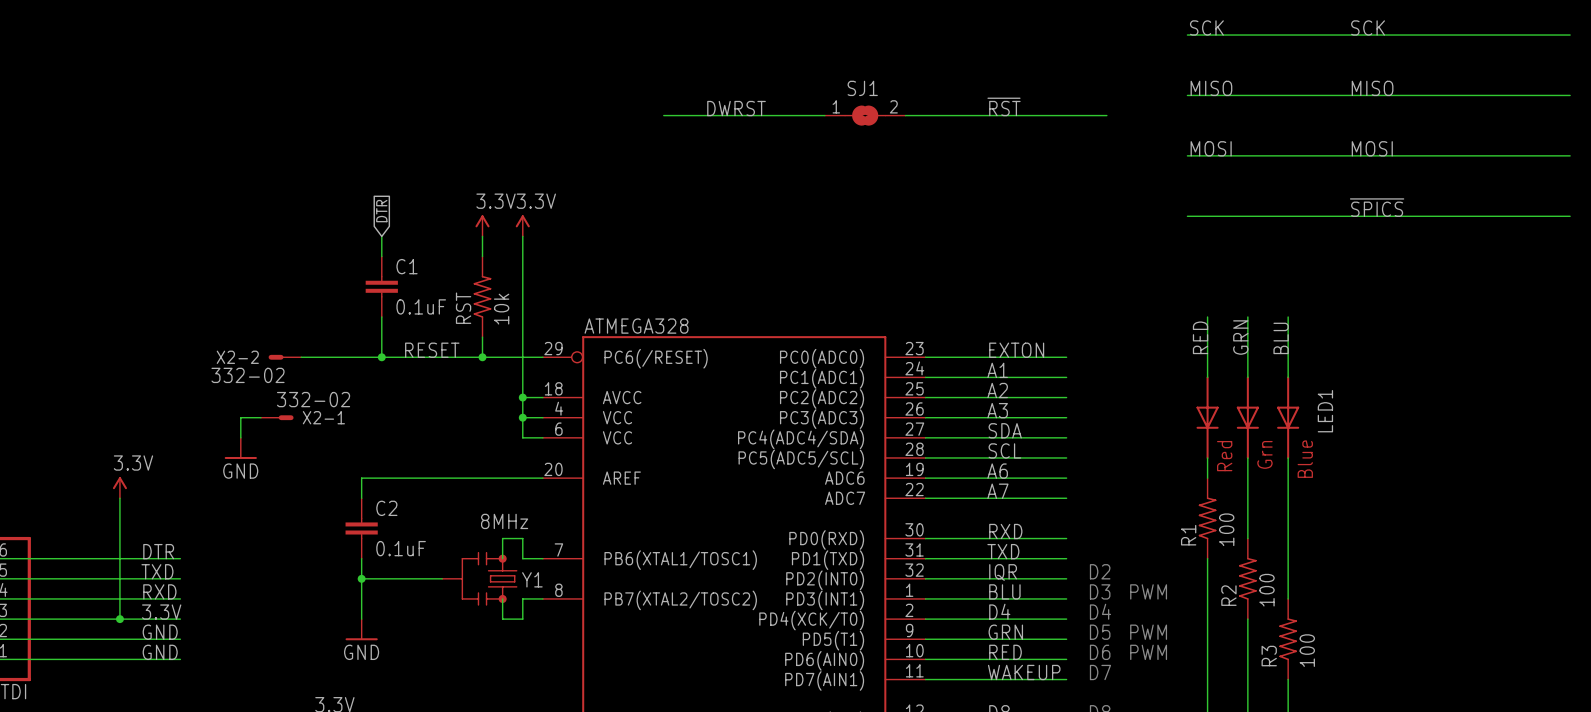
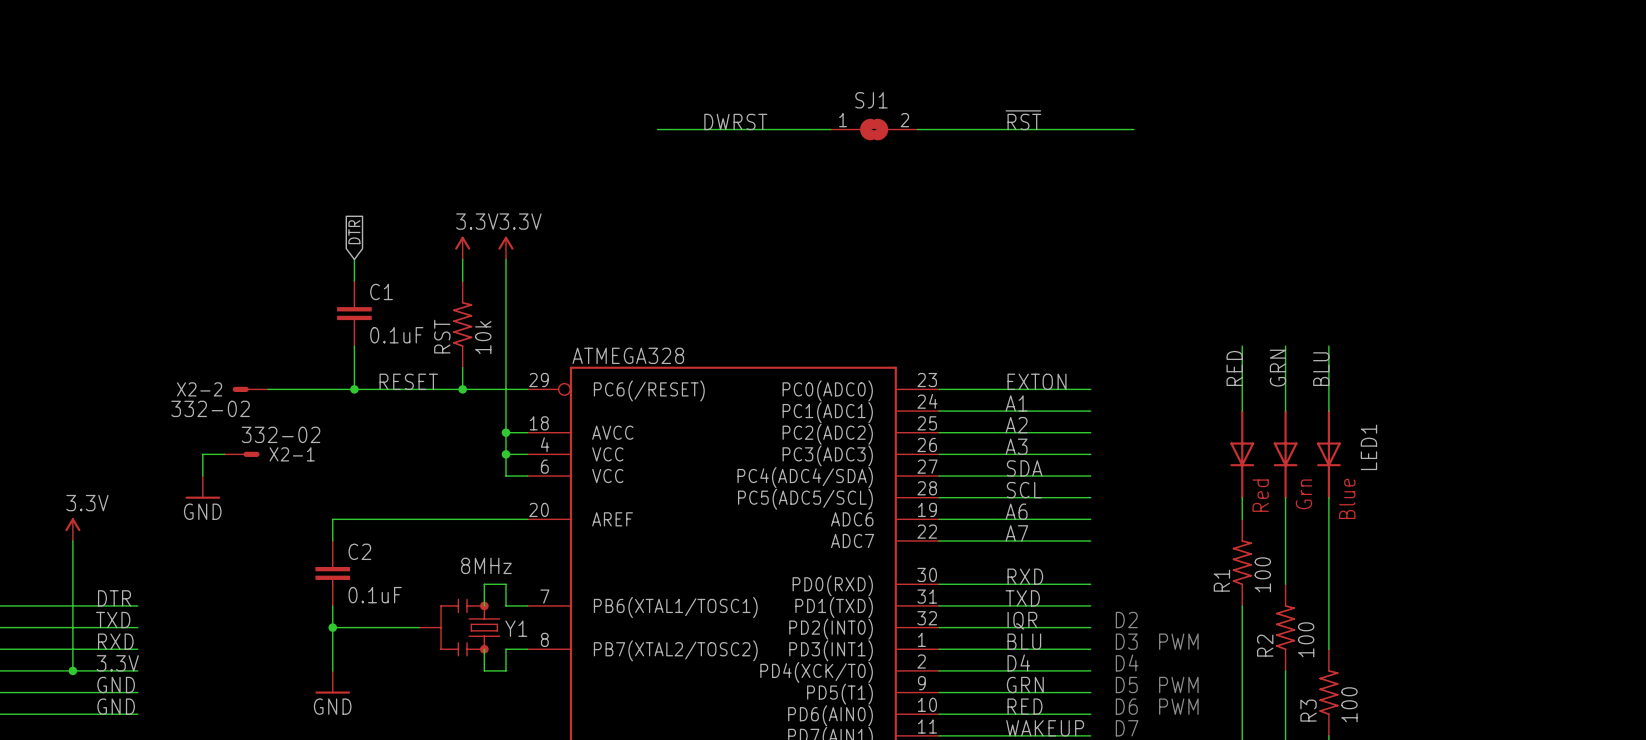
label: SCK (1206, 27) -> none
label: SCK (1368, 27) -> none
wire: (1187, 35) (1570, 35) -> none
label: MISO (1211, 88) -> none
label: MISO (1372, 88) -> none
wire: (1187, 95) (1570, 95) -> none
label: MOSI (1211, 148) -> none
label: MOSI (1372, 148) -> none
wire: (1187, 155) (1570, 155) -> none
label: ~{SPICS} (1377, 207) -> none
wire: (1187, 216) (1570, 216) -> none

